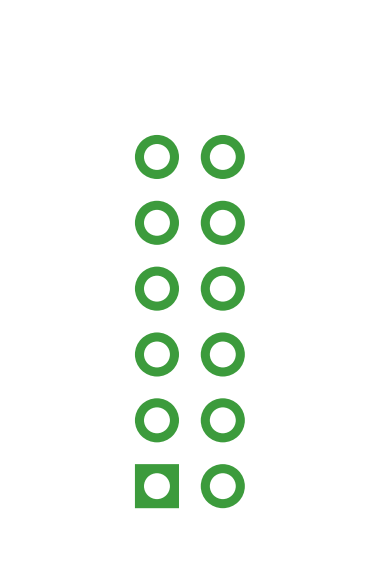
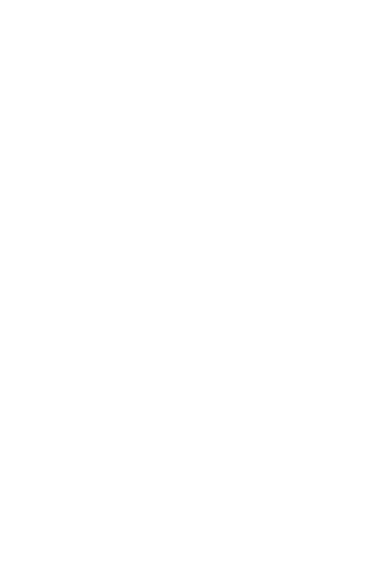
part: (189, 321) -> none

